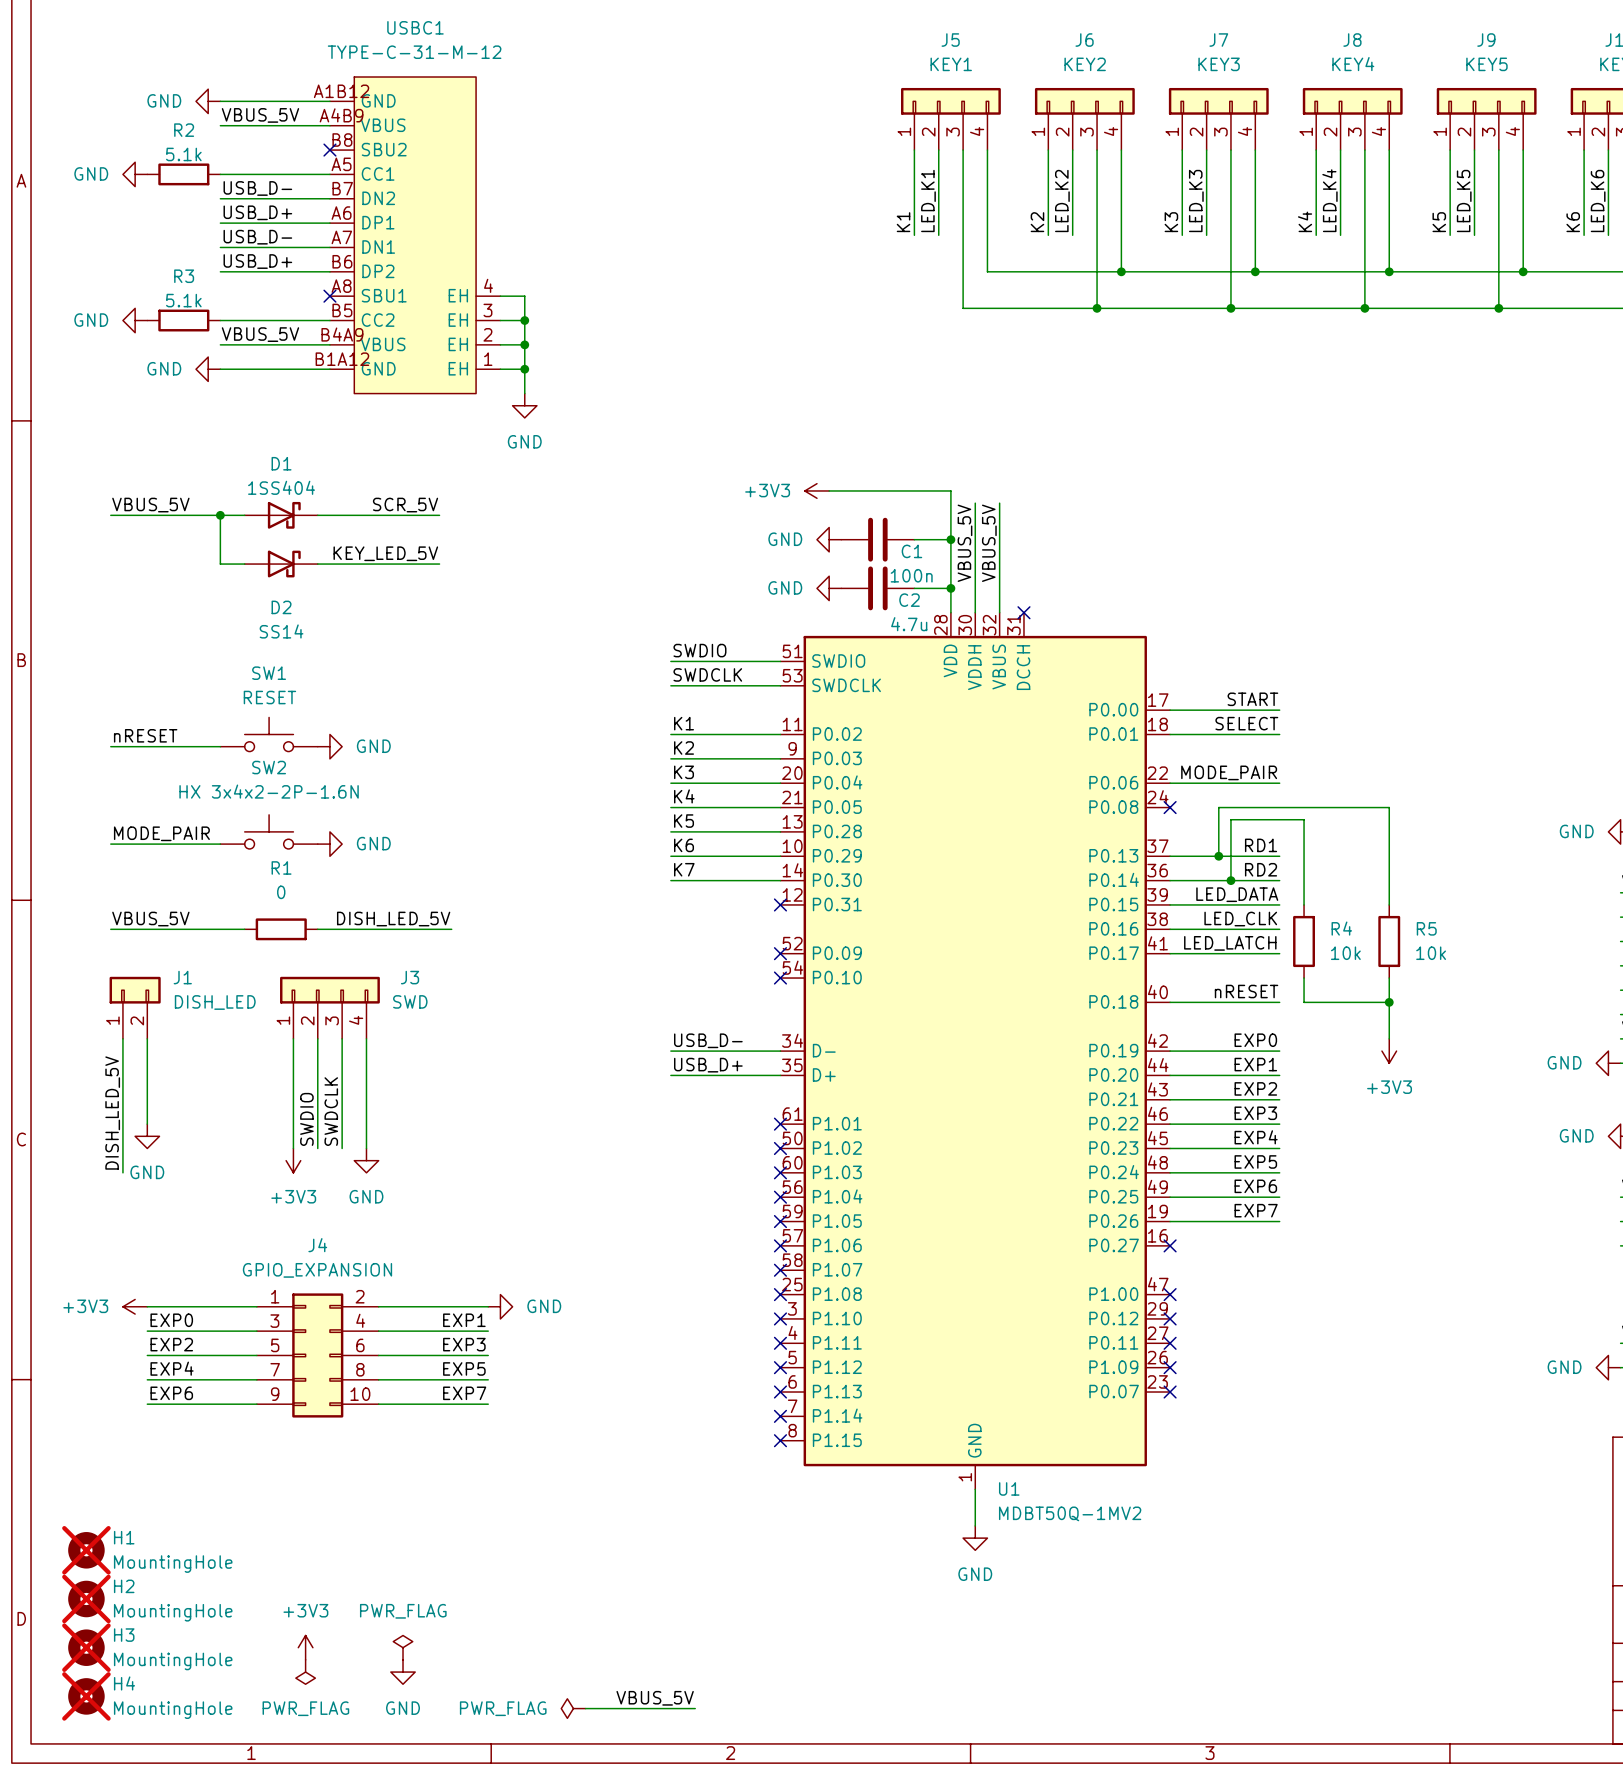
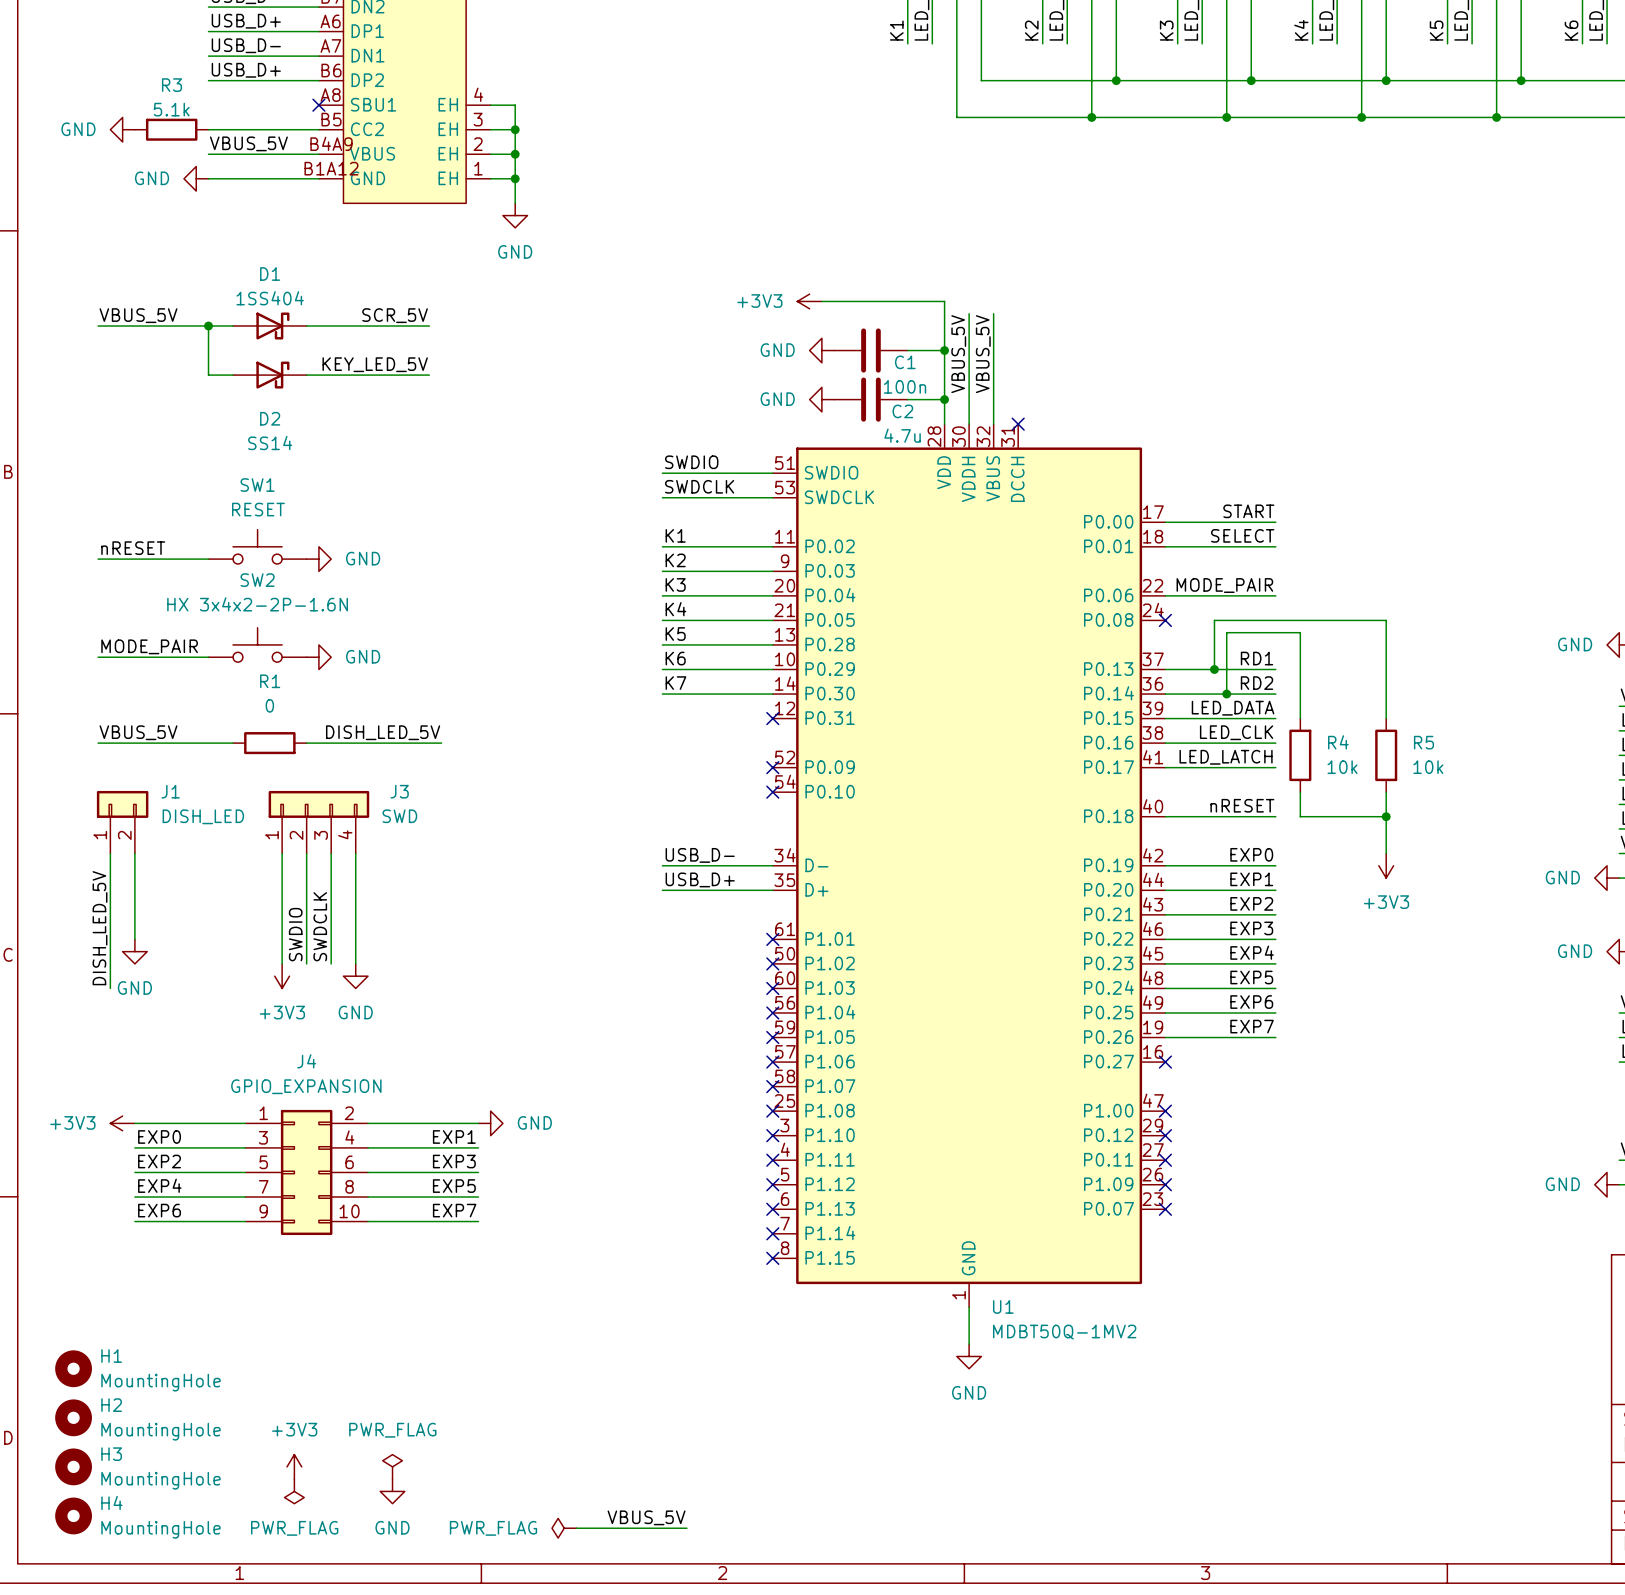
H1 do-not-place cross: (86, 1550) -> none
H2 do-not-place cross: (86, 1599) -> none
H3 do-not-place cross: (86, 1647) -> none
H4 do-not-place cross: (86, 1696) -> none

